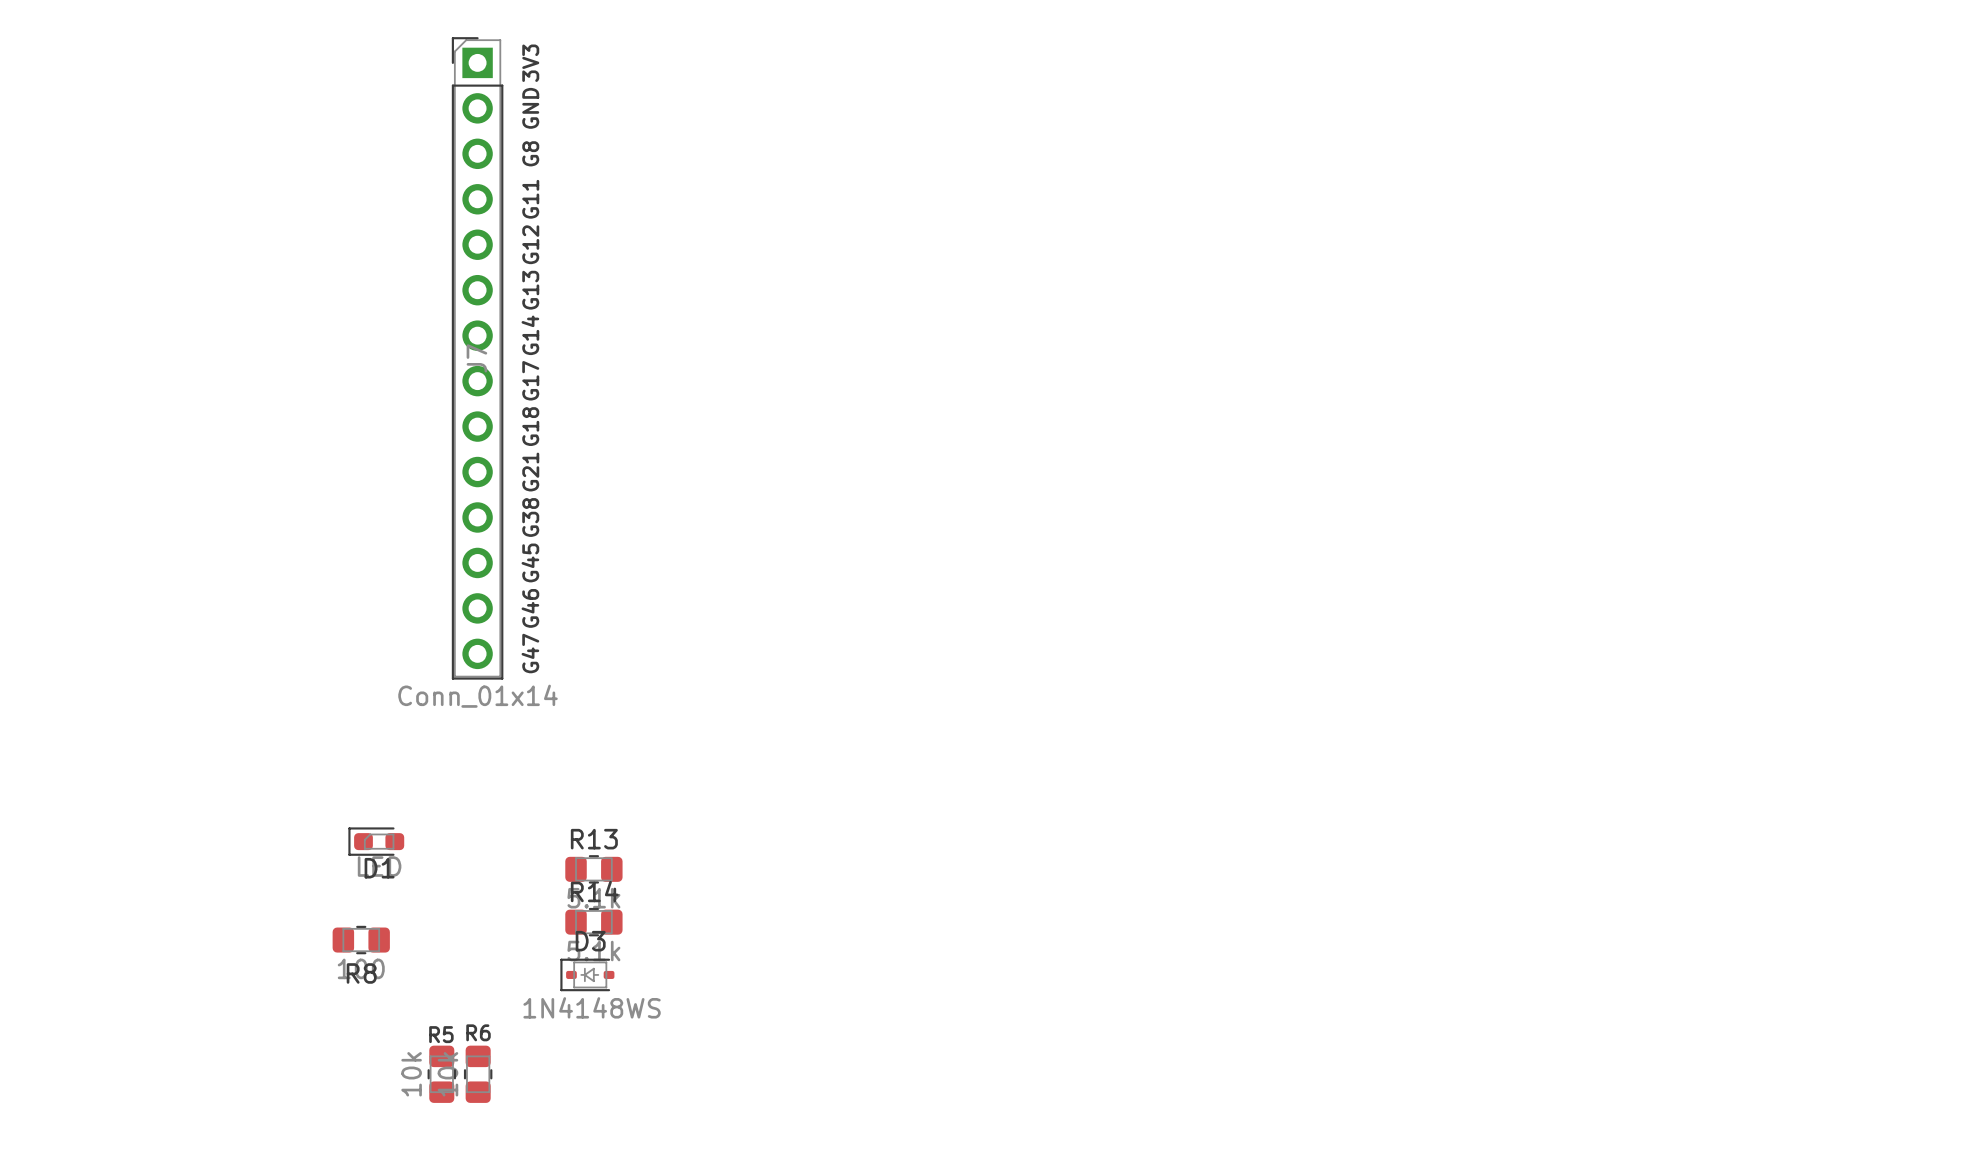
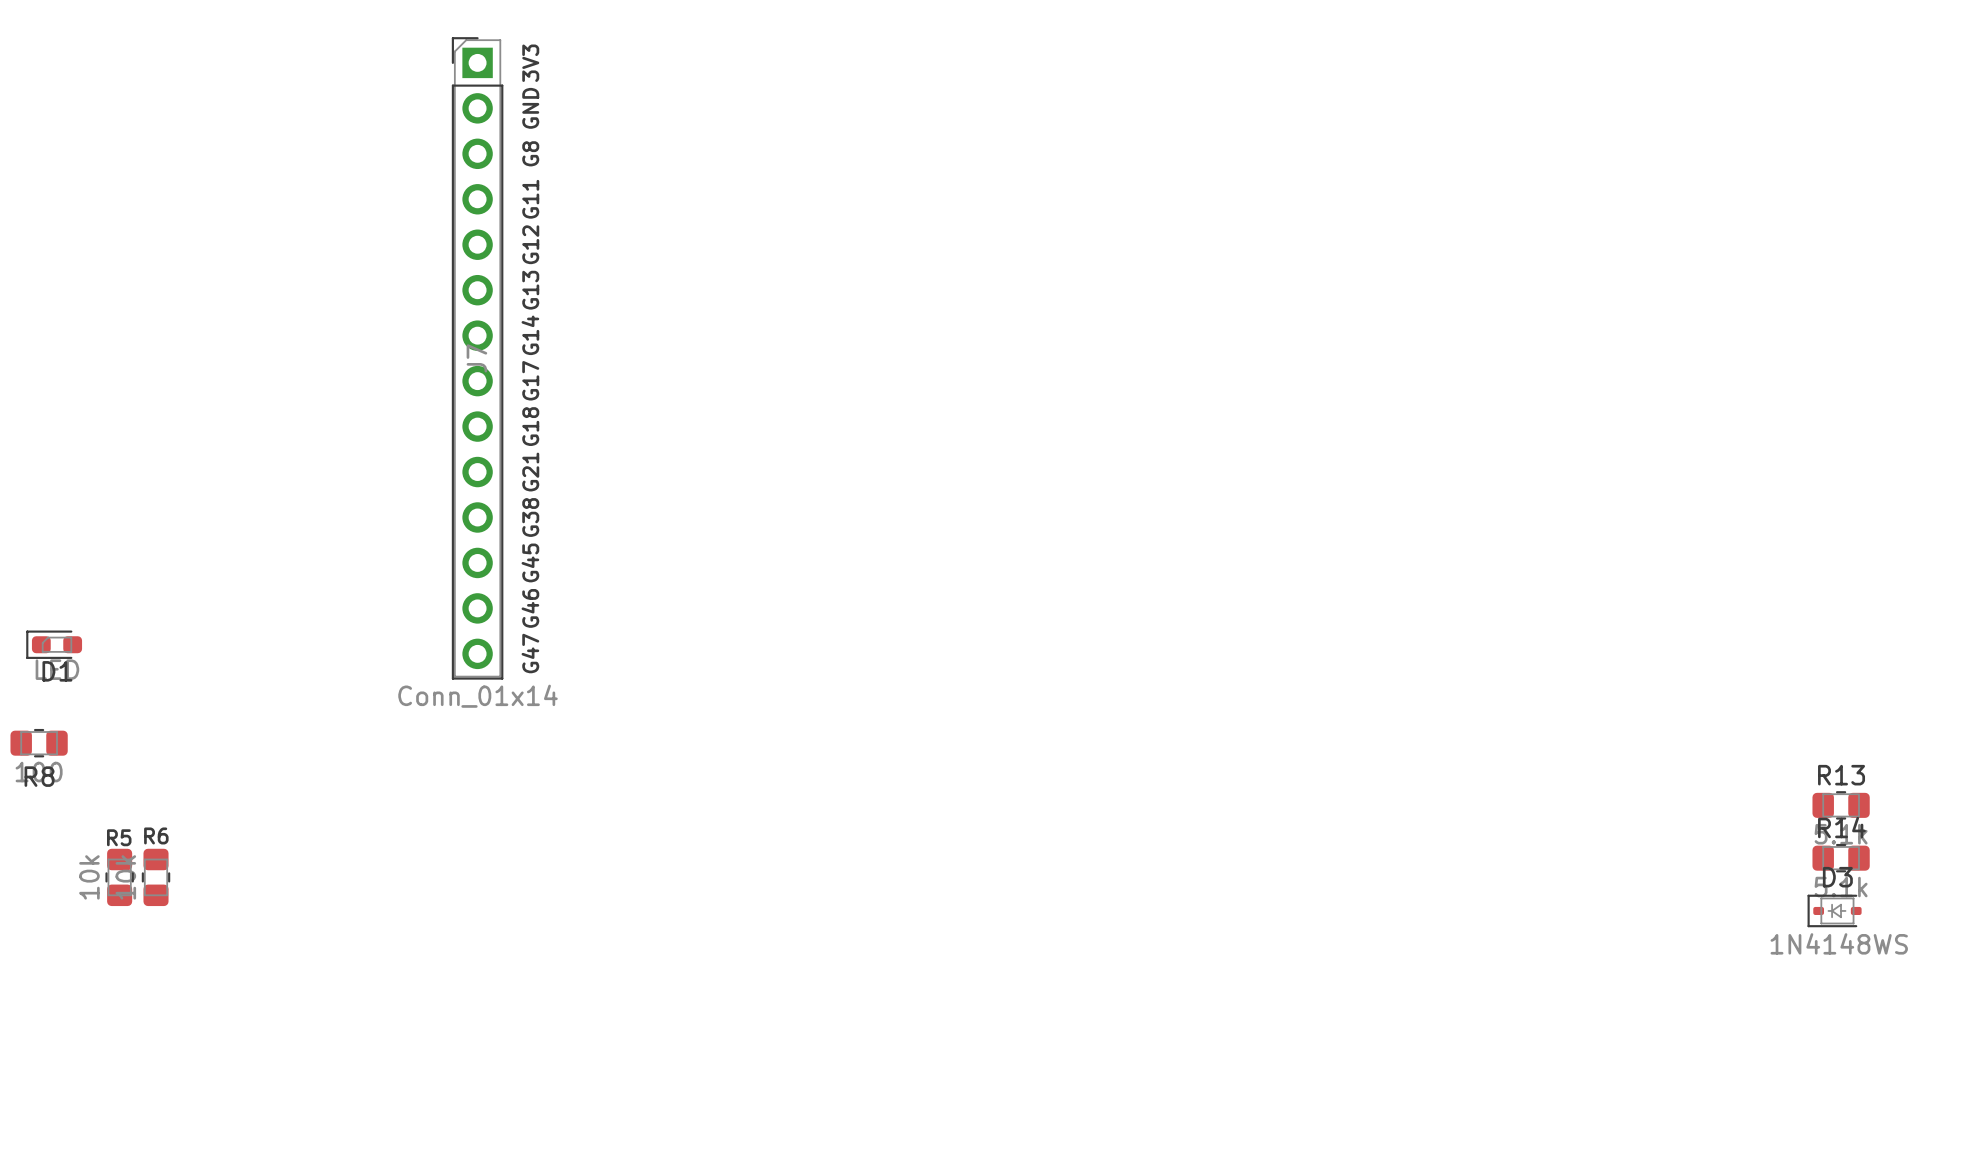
D1 position: (376, 841) -> (54, 644)
R13 position: (593, 869) -> (1841, 805)
R14 position: (593, 922) -> (1841, 858)
R8 position: (361, 940) -> (39, 743)
D3 position: (587, 974) -> (1834, 910)
R5 position: (441, 1074) -> (119, 877)
R6 position: (478, 1074) -> (156, 877)

